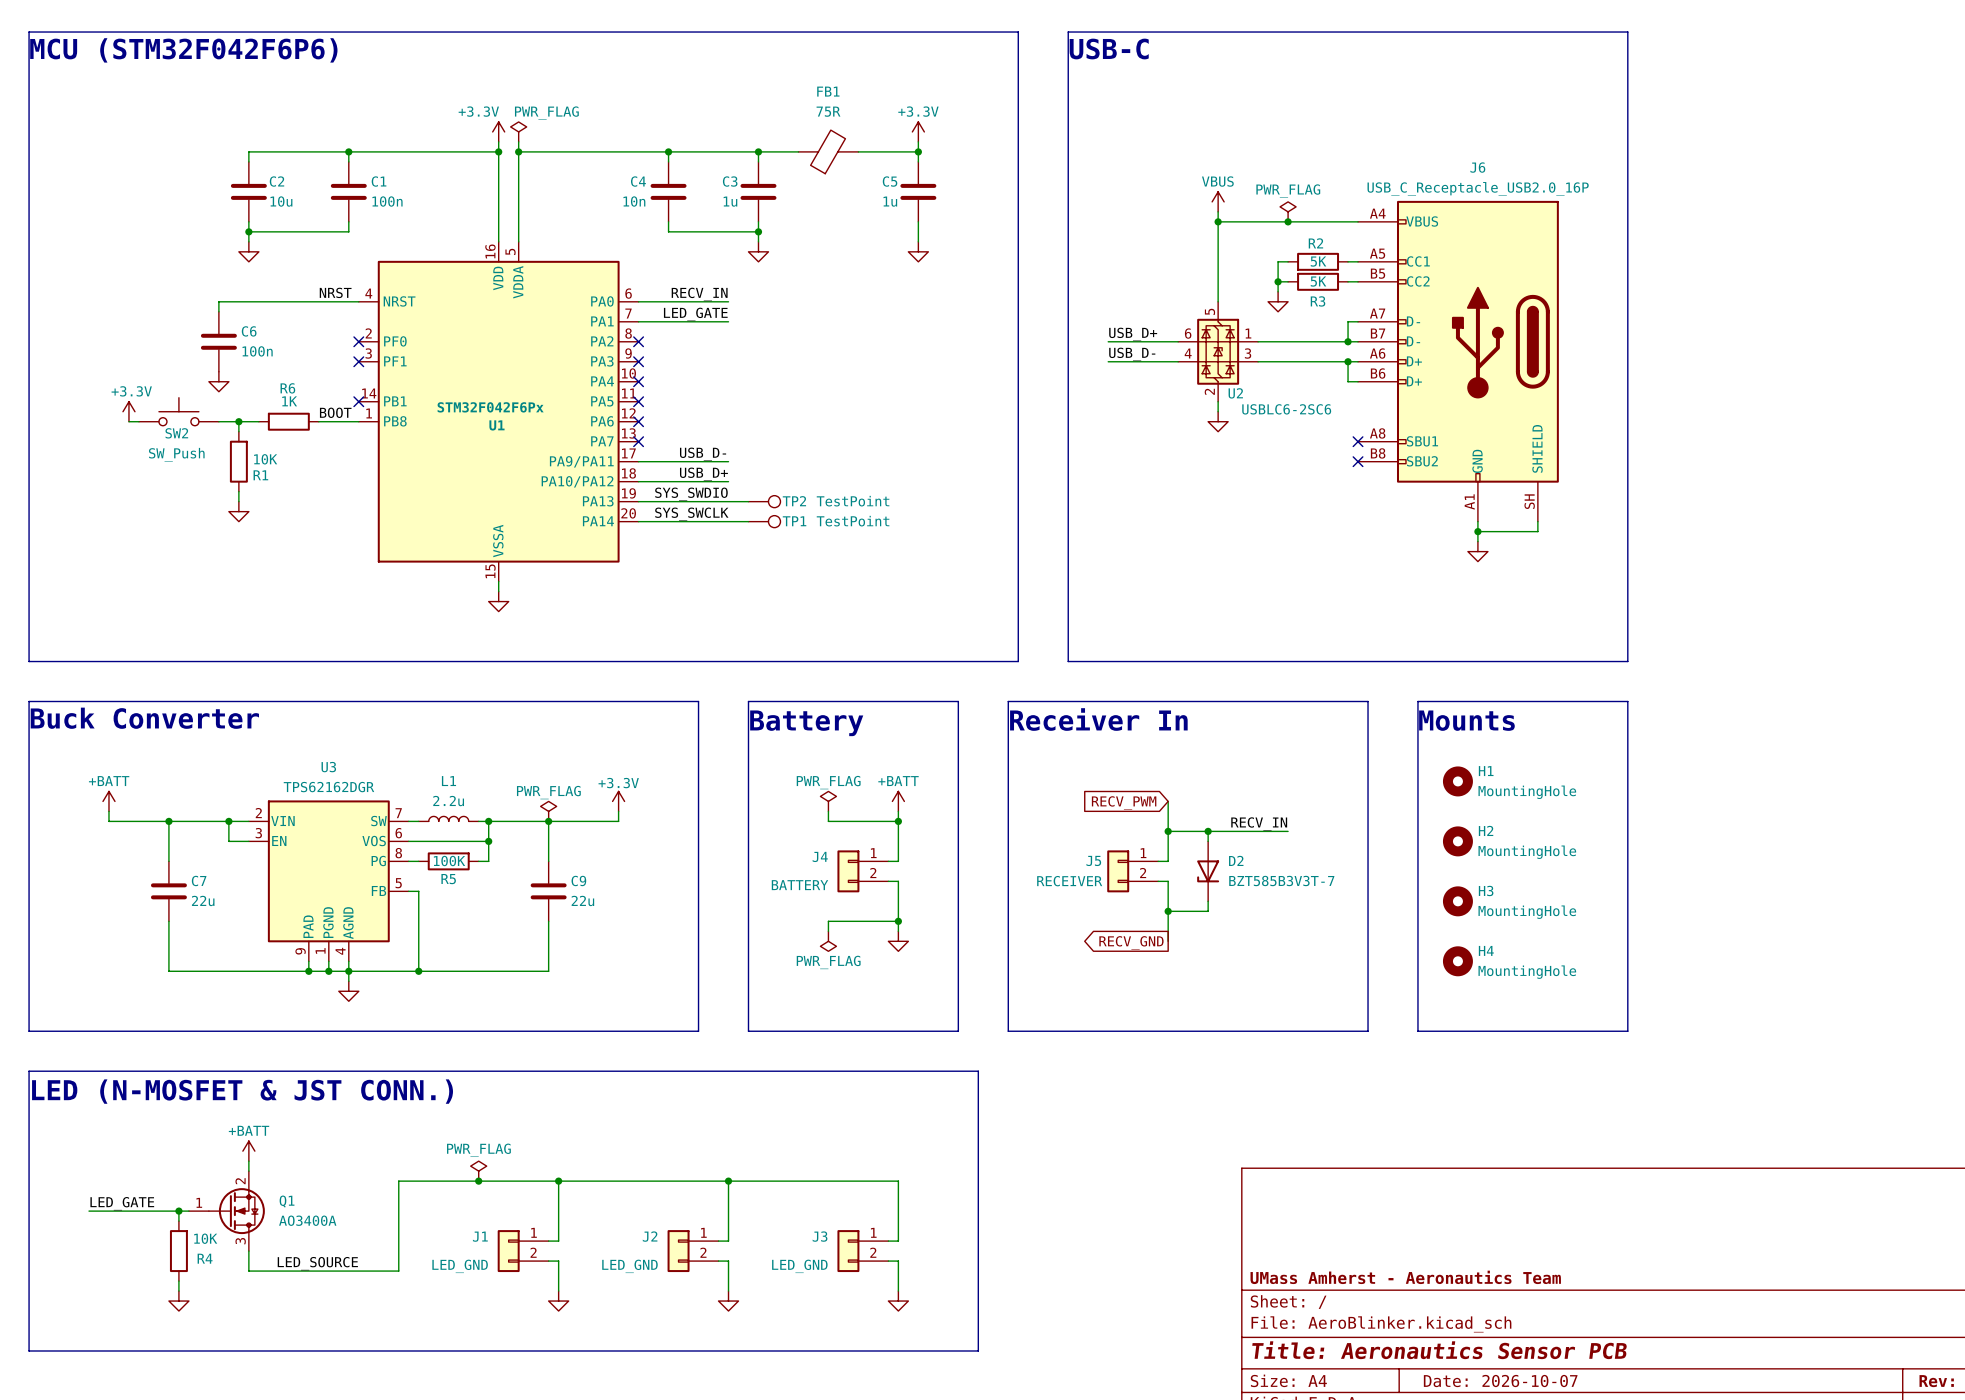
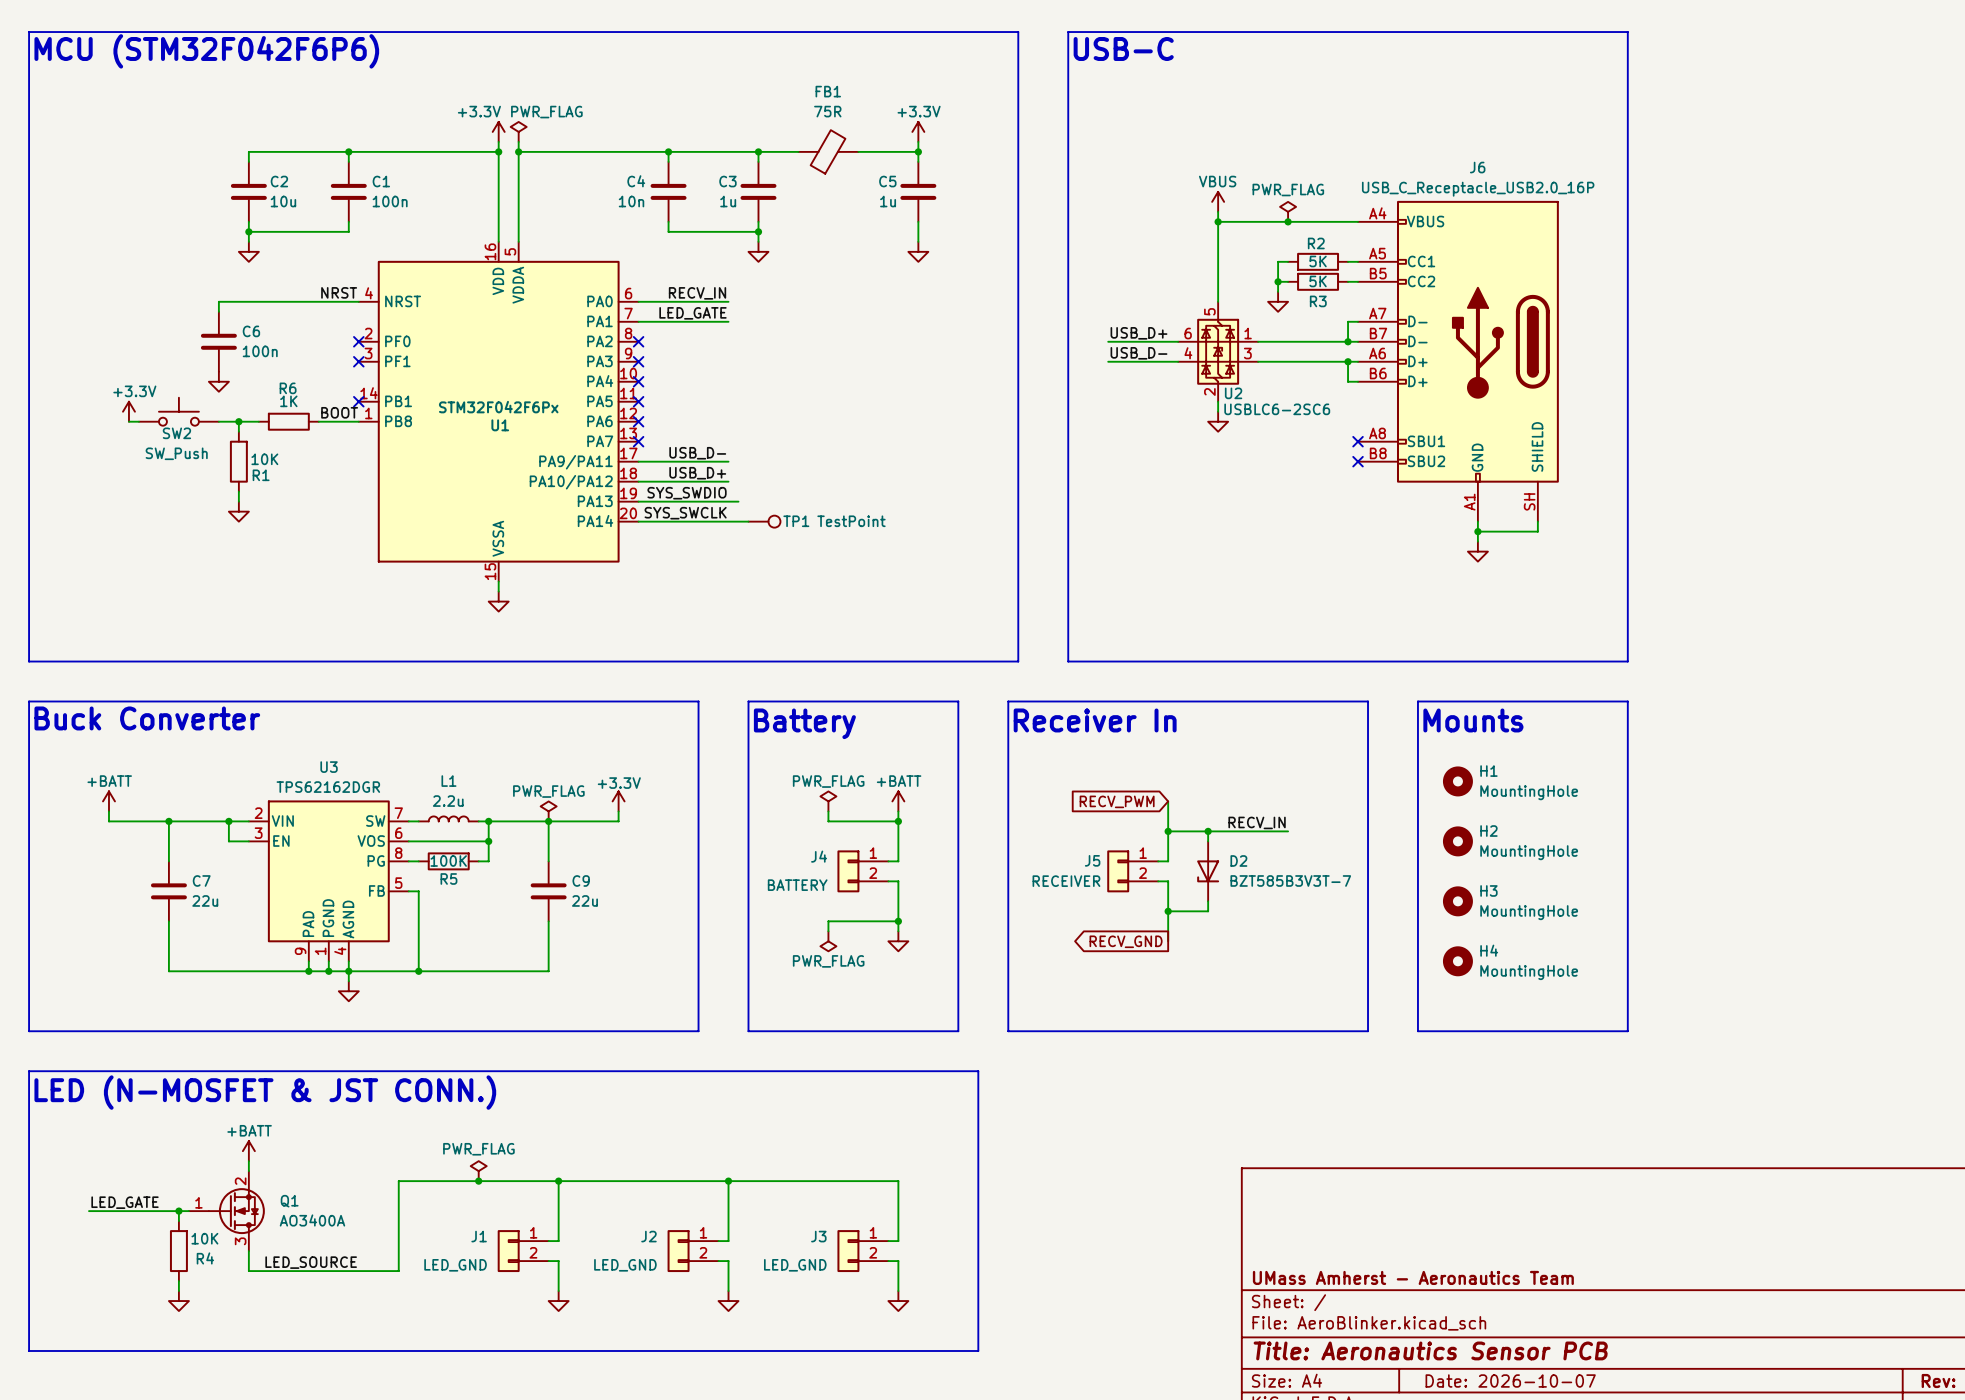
wire: (738, 501) (748, 501) -> none
TP2: TestPoint (764, 501) -> none

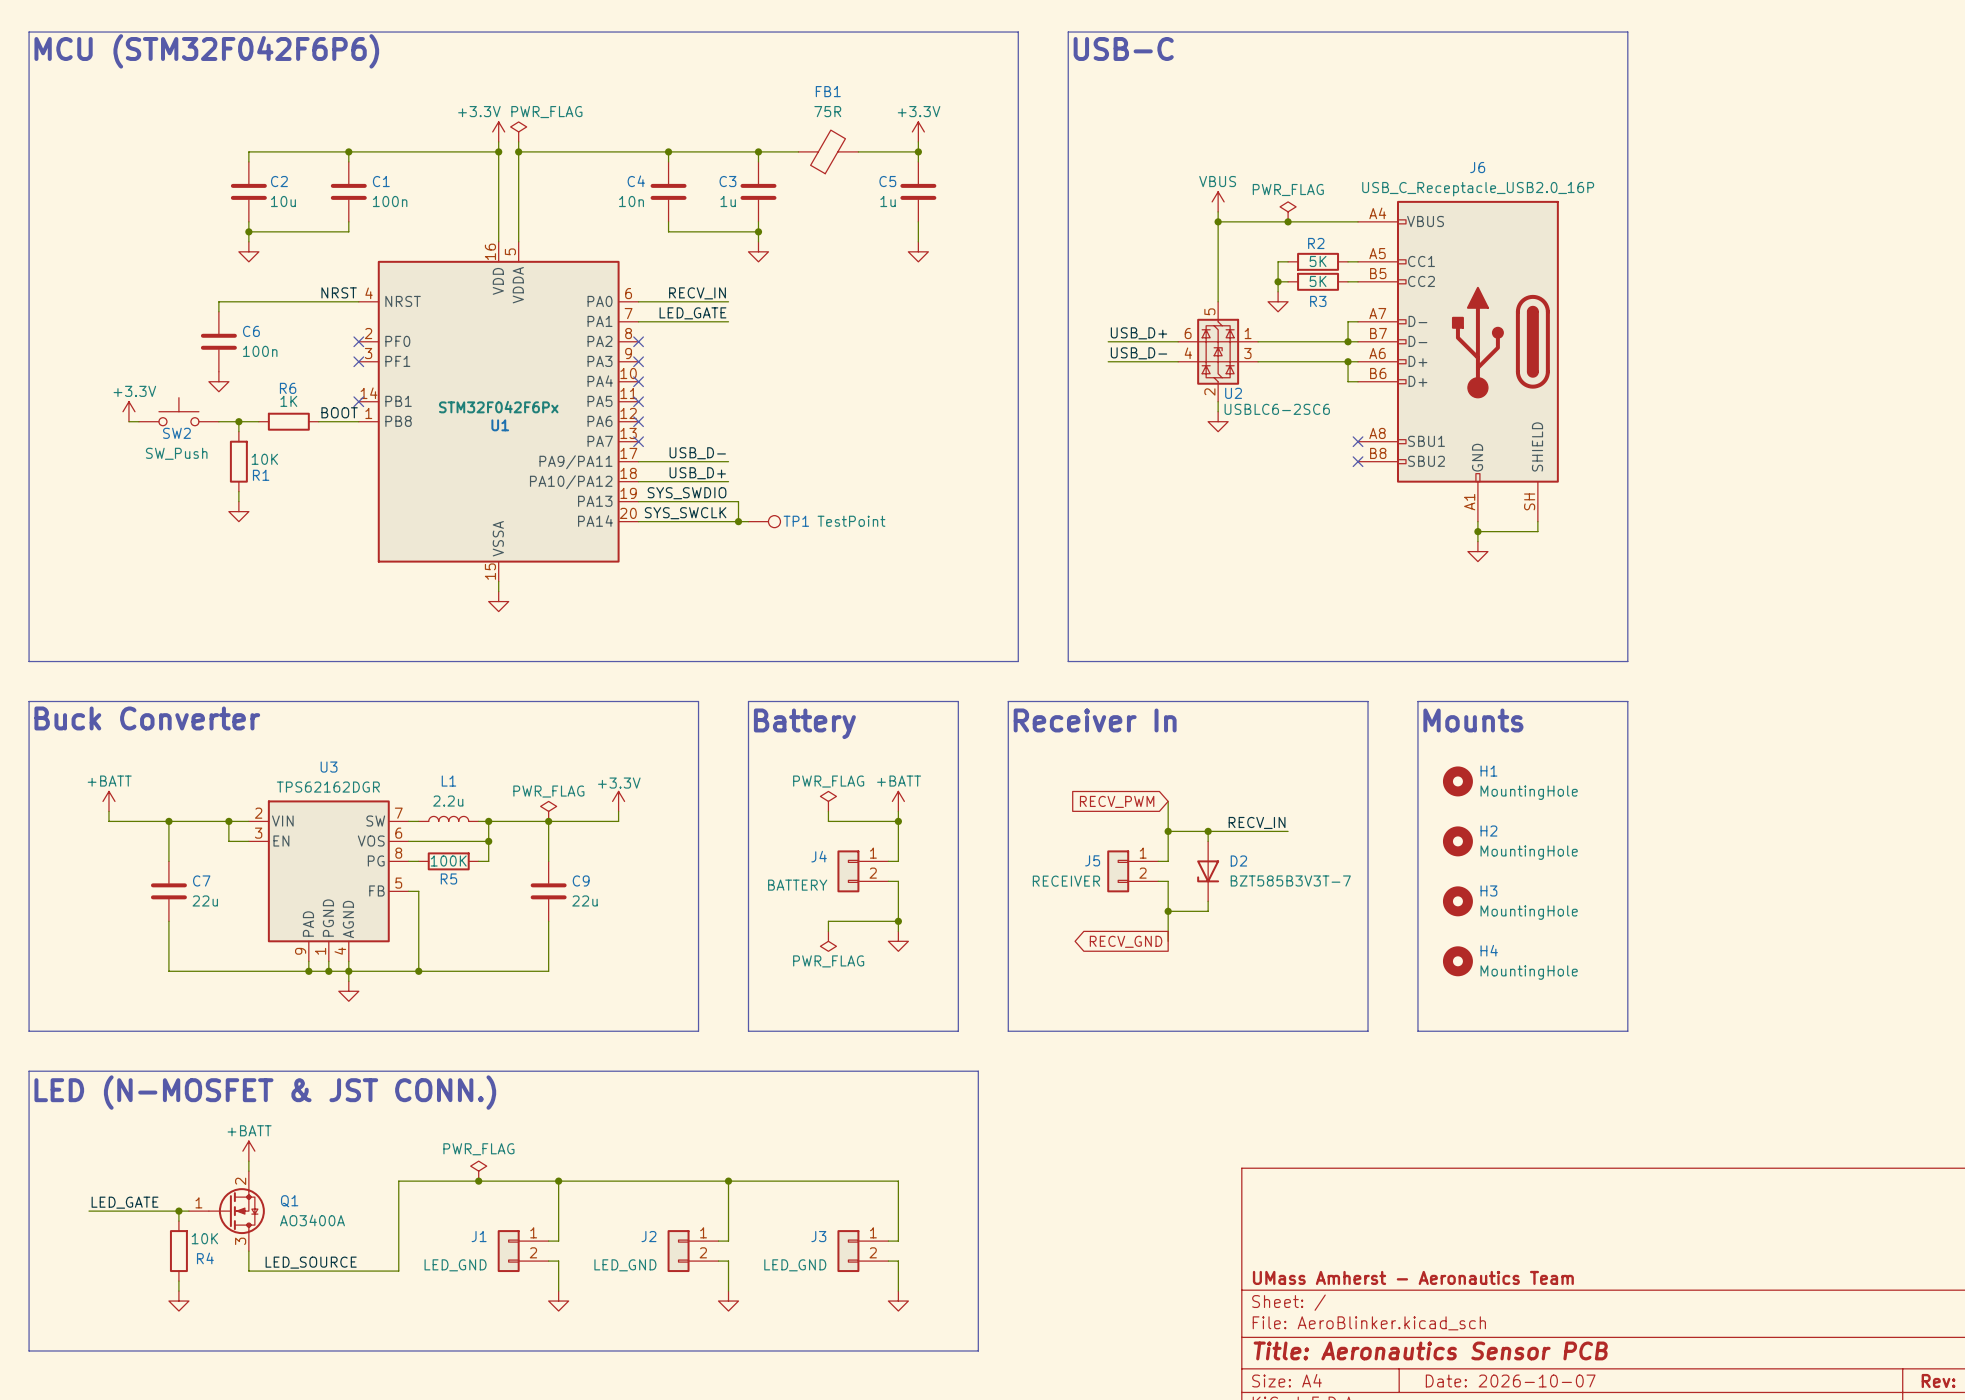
wire: none -> (738, 501) (738, 521)
junction: none -> (738, 521)

